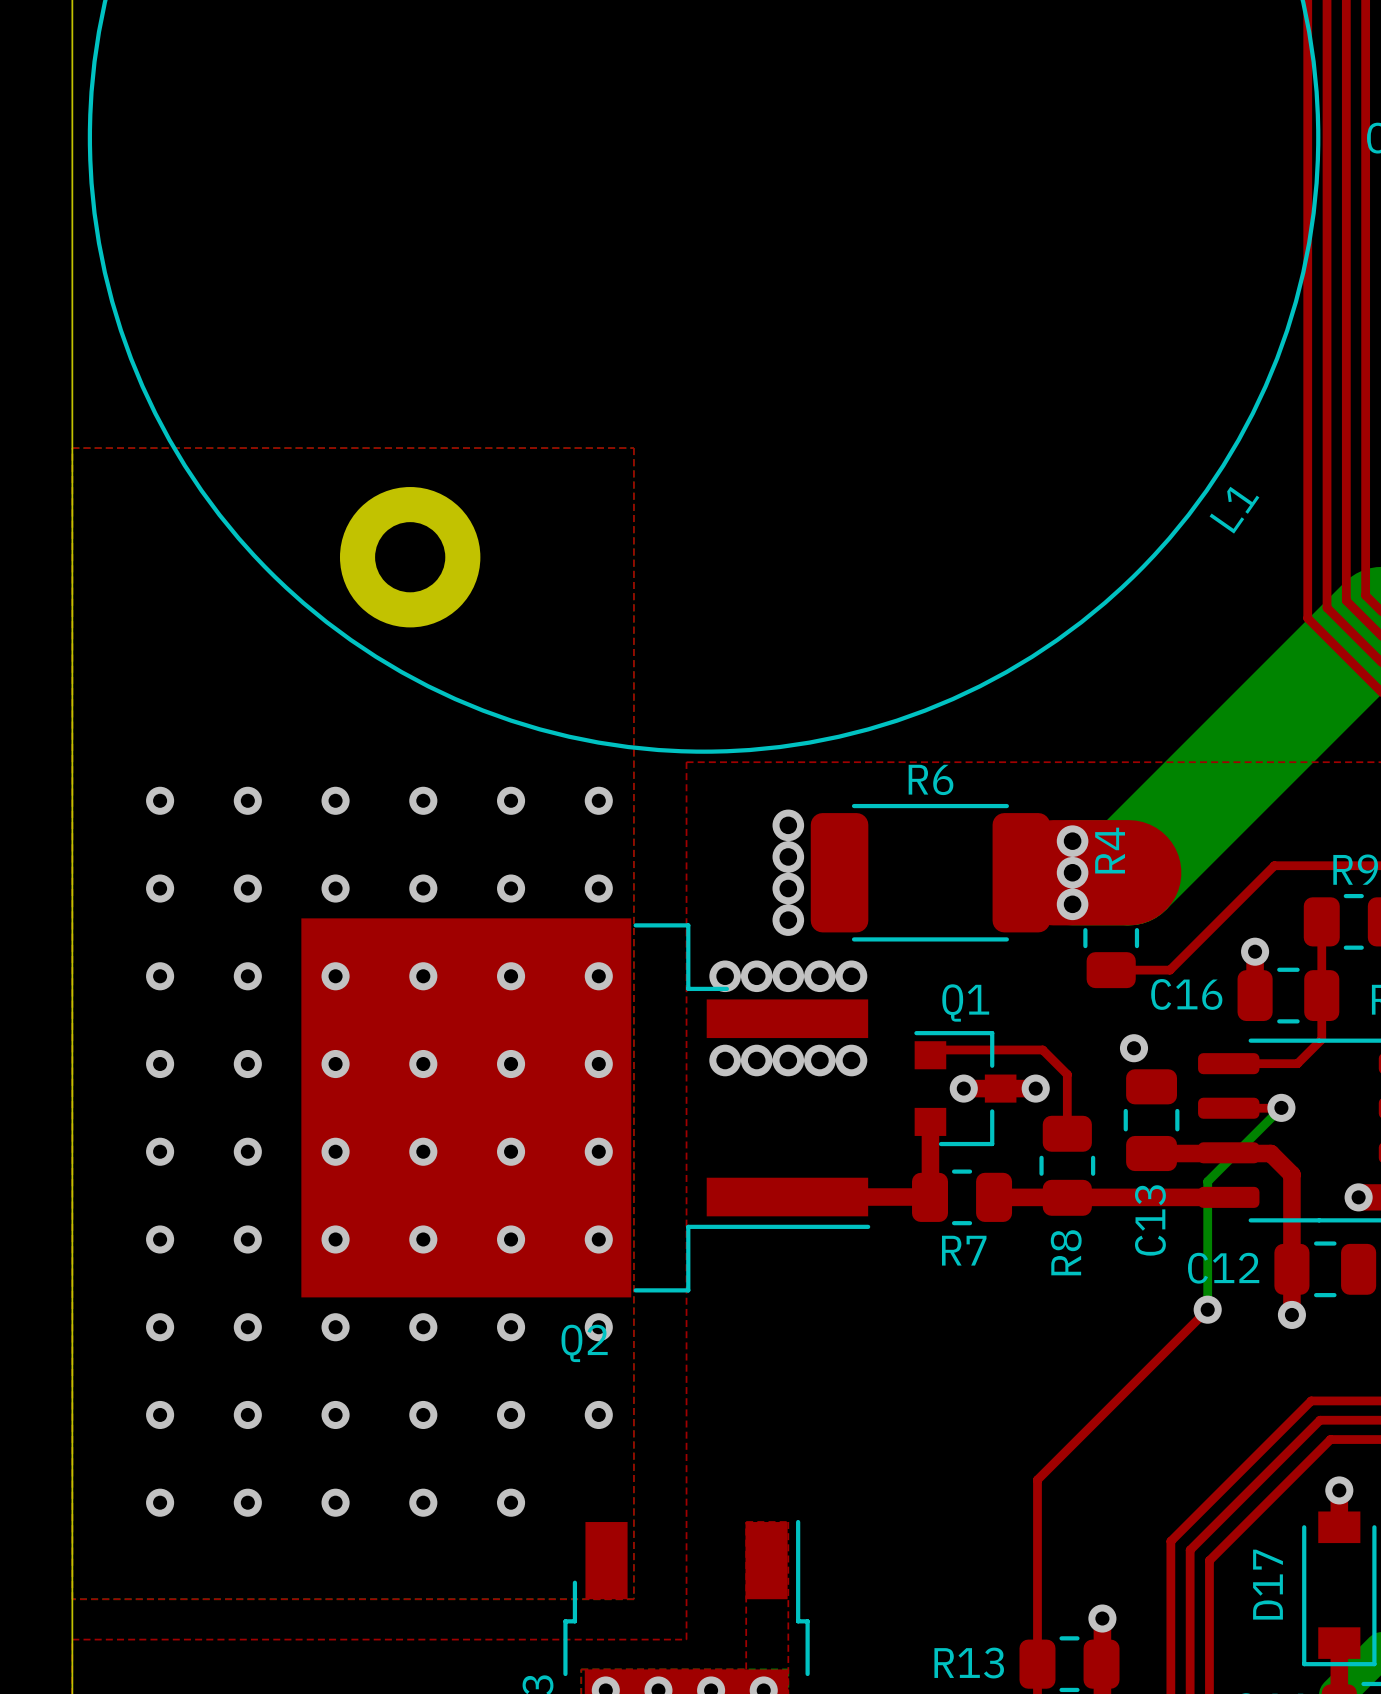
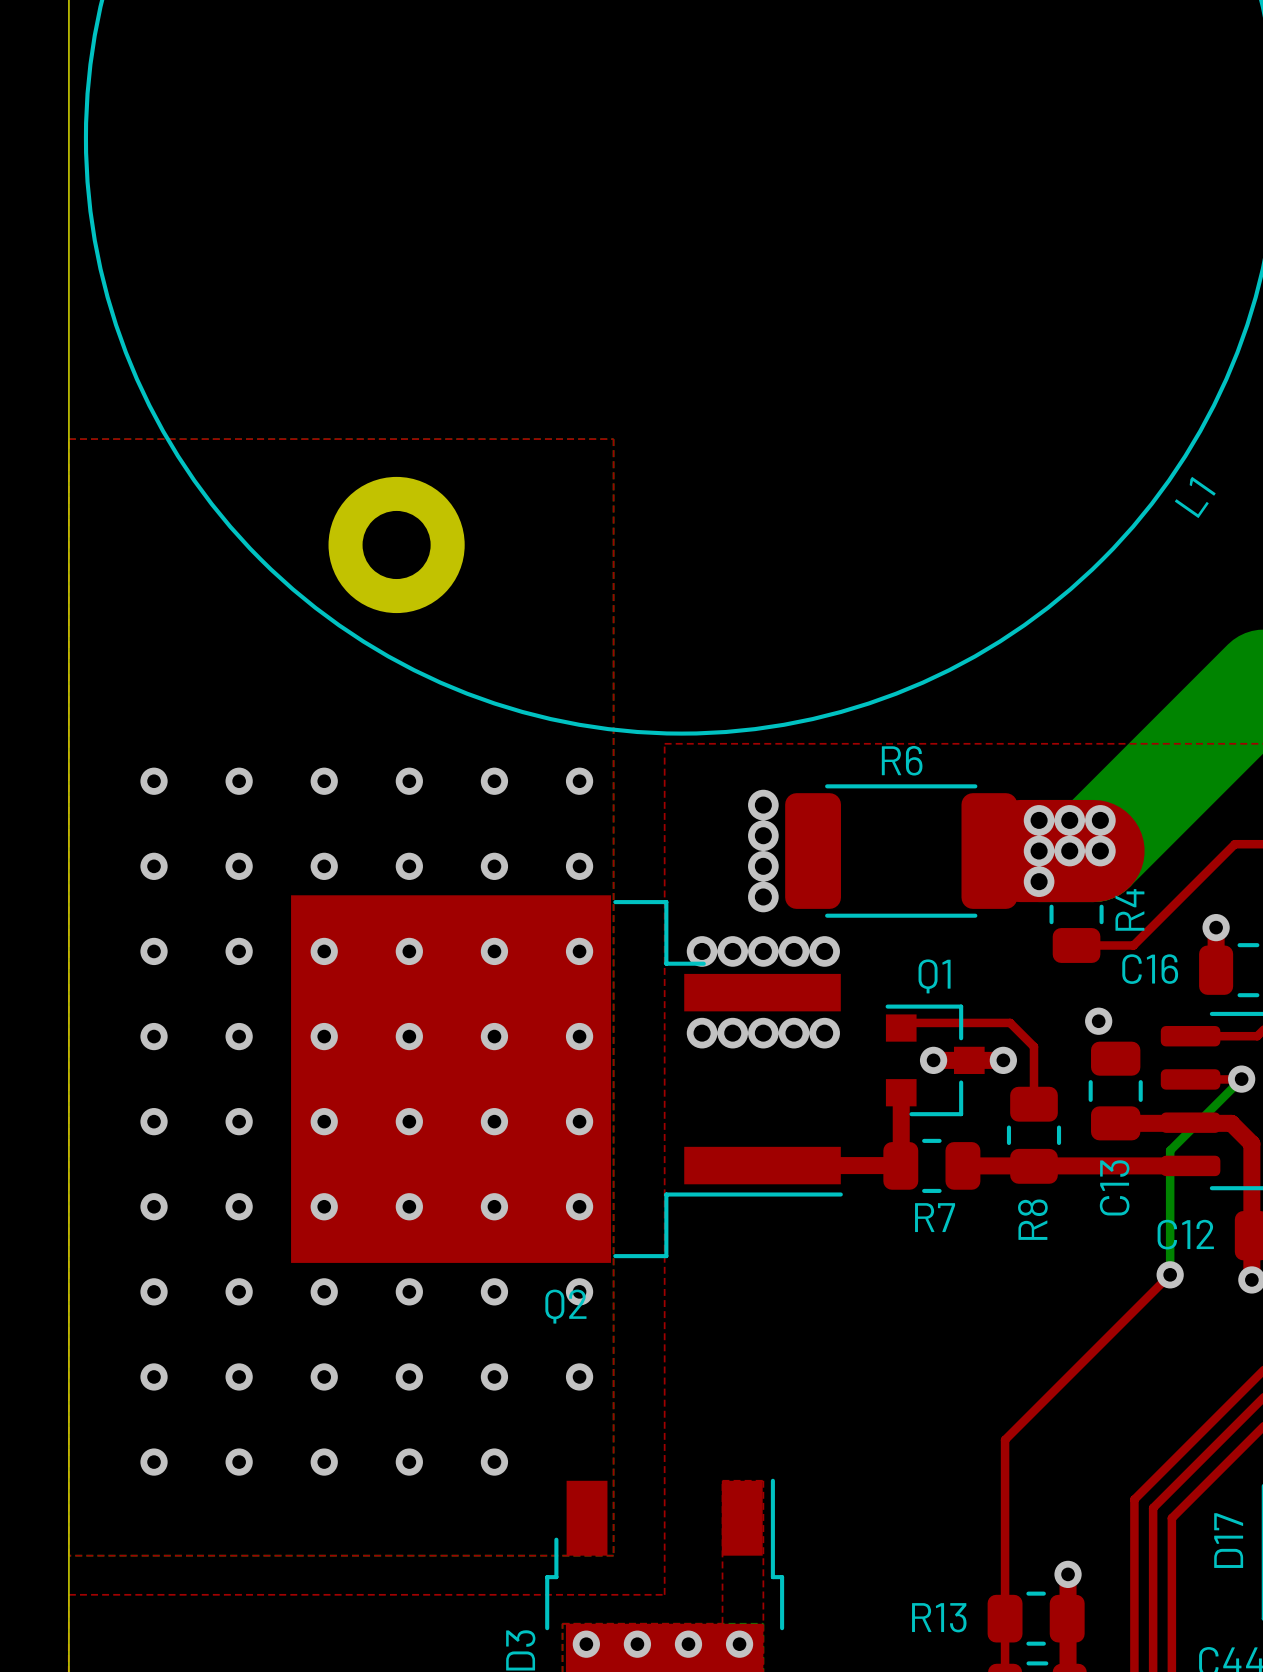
via: none -> (1069, 820)
via: none -> (1100, 820)
R4 name position: R4 (1110, 850) -> R4 (1129, 909)
via: none -> (1069, 851)
via: none -> (1100, 851)

